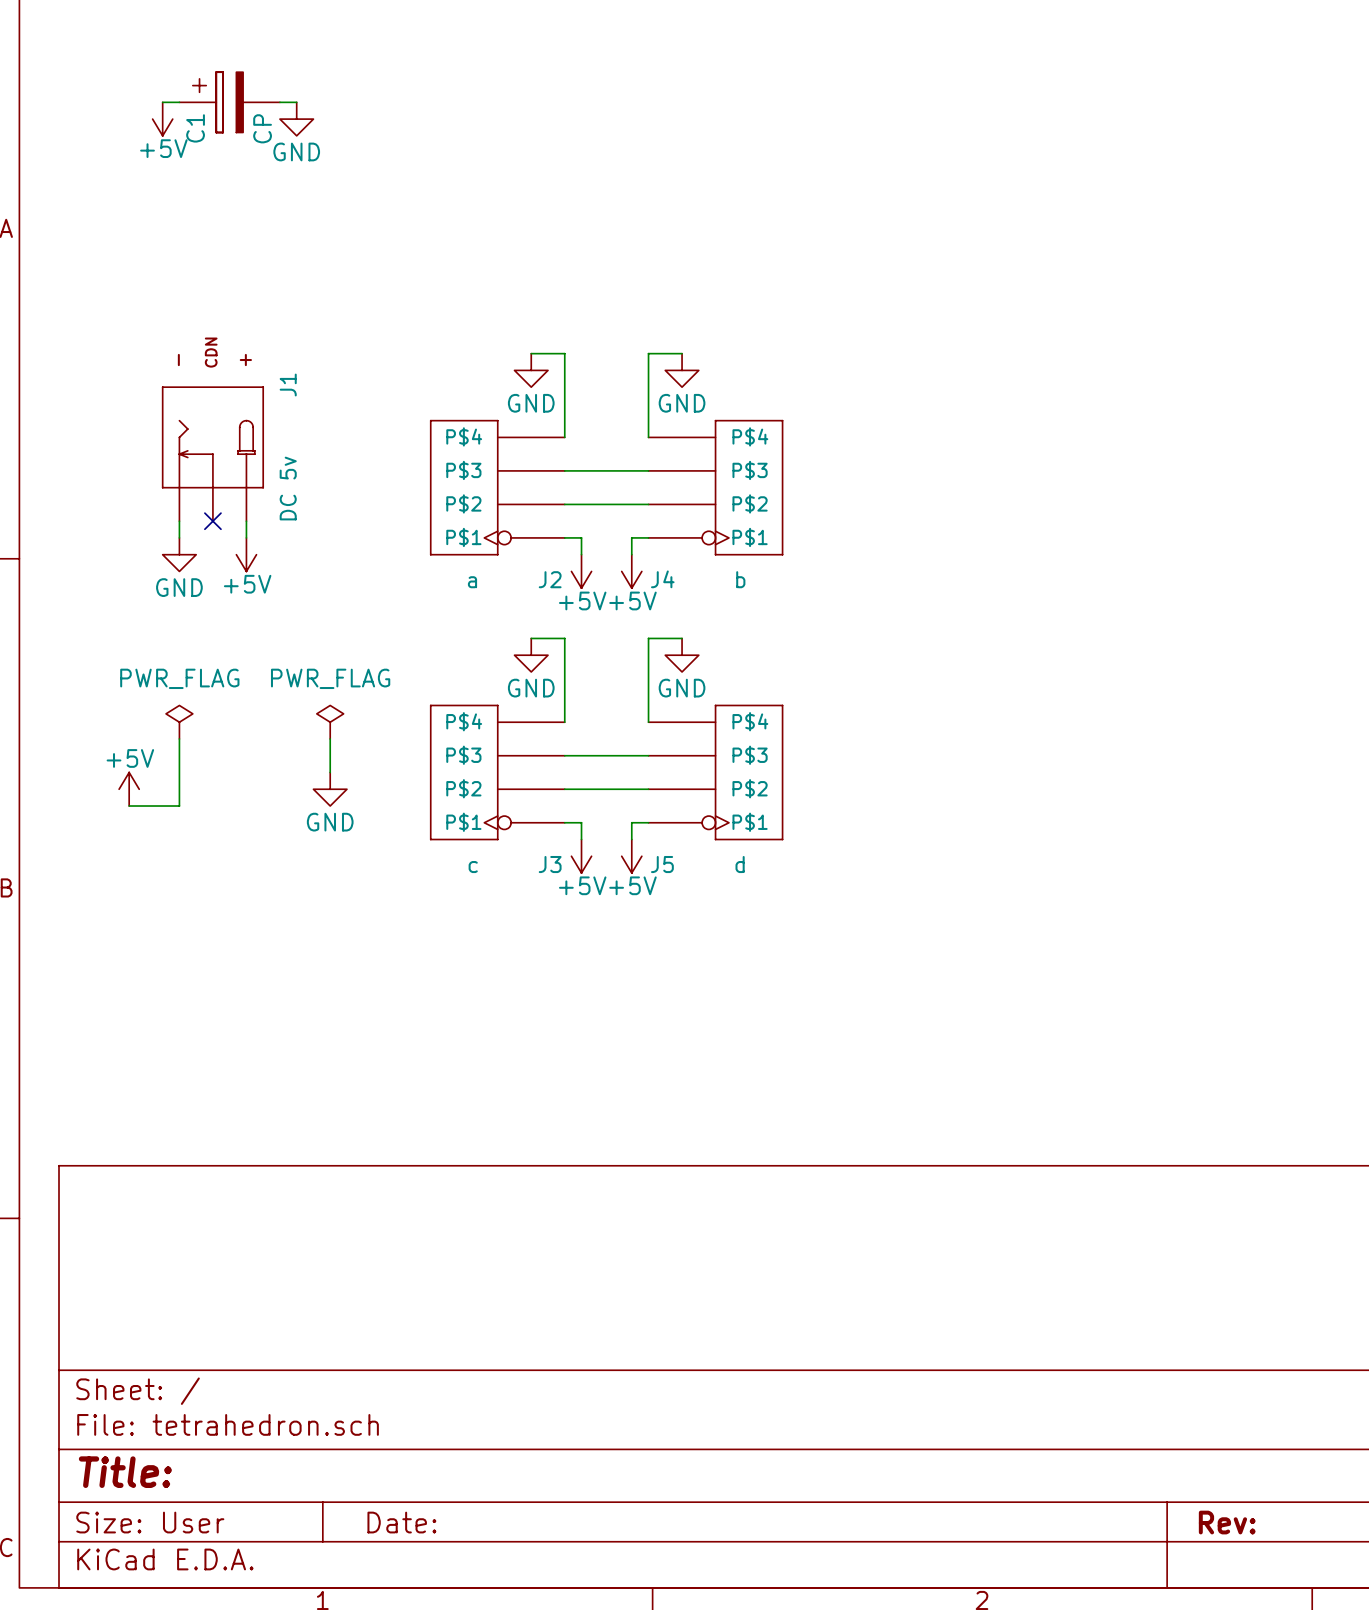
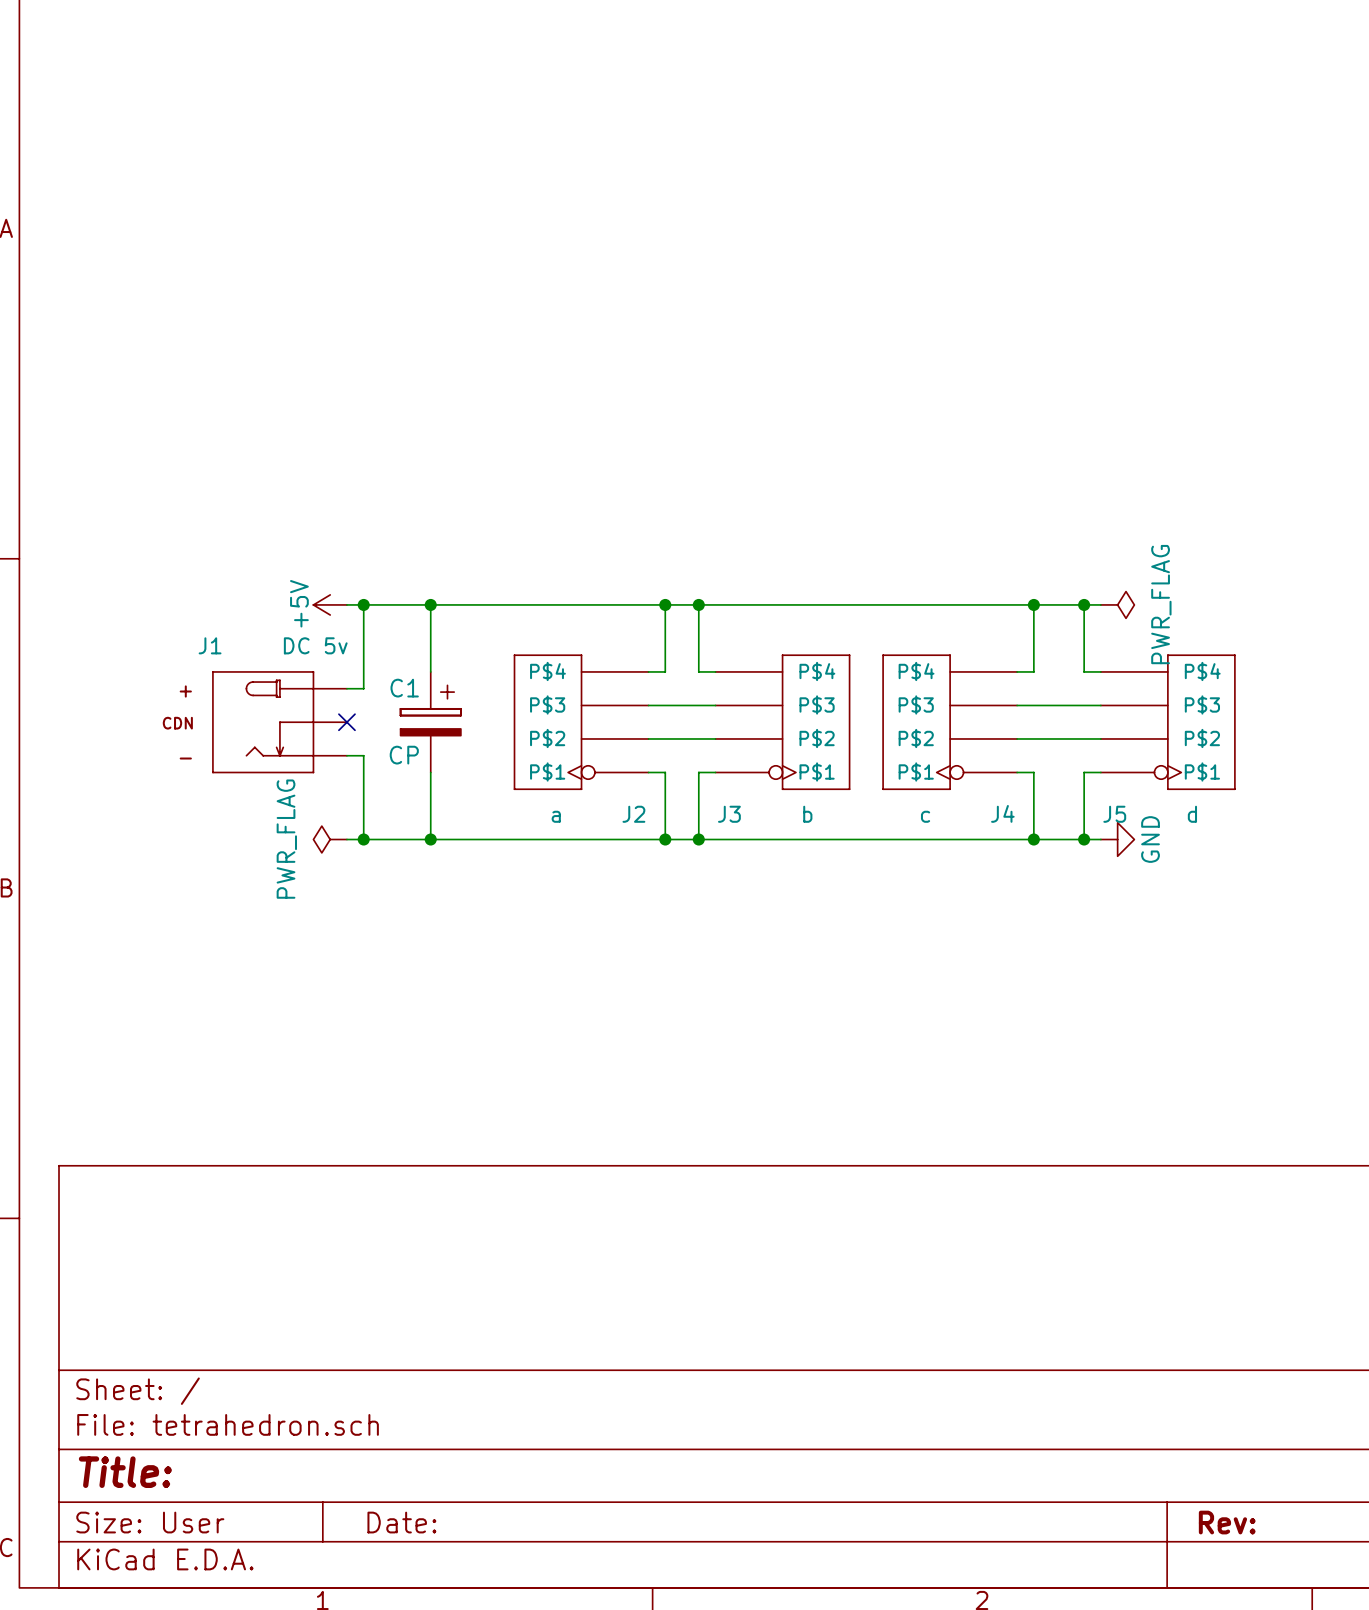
wire: (162, 102) (179, 102) -> none
C1 rotation: 0° (217, 102) -> 90° clockwise (430, 710)
C1 position: (229, 102) -> (430, 722)
wire: (279, 102) (296, 102) -> none
power symbol: +5V (162, 119) -> none
power symbol: GND (296, 119) -> none
wire: (531, 353) (564, 353) (564, 437) -> none
wire: (682, 353) (648, 353) (648, 437) -> none
power symbol: GND (531, 370) -> none
power symbol: GND (682, 370) -> none
J1 rotation: 0° (212, 437) -> 90° counterclockwise (263, 722)
J1 position: (212, 454) -> (279, 722)
wire: (564, 470) (648, 470) -> none
J2 position: (497, 487) -> (581, 722)
J4 position: (715, 487) -> (950, 722)
J4 flip: as is (749, 487) -> left-right (916, 722)
wire: (564, 504) (648, 504) -> none
wire: (179, 521) (179, 537) -> none
no-connect mark: (212, 521) -> none
wire: (246, 521) (246, 537) -> none
wire: (564, 537) (581, 537) (581, 554) -> none
wire: (648, 537) (631, 537) (631, 554) -> none
power symbol: GND (179, 554) -> none
power symbol rotation: 0° (246, 554) -> 90° clockwise (330, 604)
power symbol position: +5V (246, 554) -> +5V (330, 604)
power symbol: +5V (581, 571) -> none
power symbol: +5V (631, 571) -> none
J4 value: b (740, 579) -> c (925, 816)
wire: none -> (346, 604) (1100, 604)
wire: none -> (363, 604) (363, 688) (346, 688)
junction: none -> (363, 604)
wire: none -> (430, 604) (430, 671)
junction: none -> (430, 604)
wire: none -> (665, 604) (665, 671) (648, 671)
junction: none -> (665, 604)
wire: none -> (698, 604) (698, 671) (715, 671)
junction: none -> (698, 604)
wire: none -> (1033, 604) (1033, 671) (1017, 671)
junction: none -> (1033, 604)
wire: none -> (1084, 604) (1084, 671) (1100, 671)
junction: none -> (1084, 604)
power symbol: none -> PWR_FLAG (1117, 604)
wire: (531, 638) (564, 638) (564, 722) -> none
wire: (682, 638) (648, 638) (648, 722) -> none
power symbol: GND (531, 655) -> none
power symbol: GND (682, 655) -> none
wire: none -> (648, 705) (715, 705)
wire: none -> (1017, 705) (1100, 705)
power symbol: PWR_FLAG (179, 722) -> none
power symbol: PWR_FLAG (330, 722) -> none
no-connect mark: none -> (346, 722)
wire: (179, 738) (179, 806) (129, 806) -> none
wire: (330, 738) (330, 772) -> none
wire: none -> (648, 738) (715, 738)
wire: none -> (1017, 738) (1100, 738)
wire: none -> (346, 755) (363, 755) (363, 839)
wire: (564, 755) (648, 755) -> none
J3 flip: as is (464, 772) -> left-right (816, 722)
J3 position: (497, 772) -> (782, 722)
wire: none -> (648, 772) (665, 772) (665, 839)
wire: none -> (715, 772) (698, 772) (698, 839)
J5 position: (715, 772) -> (1167, 722)
wire: none -> (1017, 772) (1033, 772) (1033, 839)
wire: none -> (1100, 772) (1084, 772) (1084, 839)
power symbol: +5V (129, 789) -> none
power symbol: GND (330, 789) -> none
wire: (564, 789) (648, 789) -> none
wire: (564, 822) (581, 822) (581, 839) -> none
wire: (648, 822) (631, 822) (631, 839) -> none
power symbol: none -> PWR_FLAG (330, 839)
wire: none -> (346, 839) (1100, 839)
junction: none -> (363, 839)
junction: none -> (430, 839)
junction: none -> (665, 839)
junction: none -> (698, 839)
junction: none -> (1033, 839)
junction: none -> (1084, 839)
power symbol: none -> GND (1117, 839)
power symbol: +5V (581, 856) -> none
power symbol: +5V (631, 856) -> none
J3 value: c (473, 867) -> b (807, 814)

